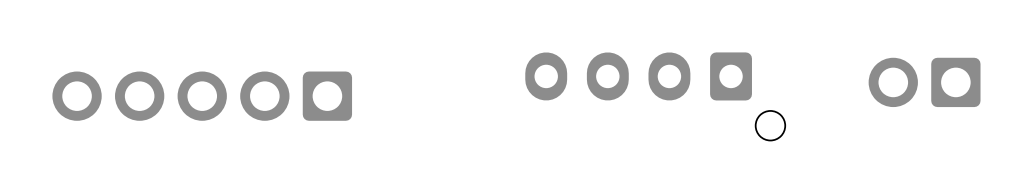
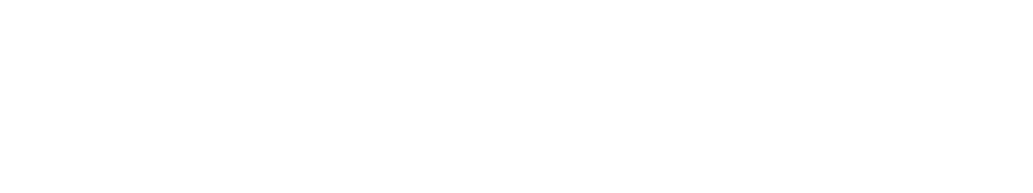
part: (924, 82) -> none
part: (202, 96) -> none
part: (655, 96) -> none

